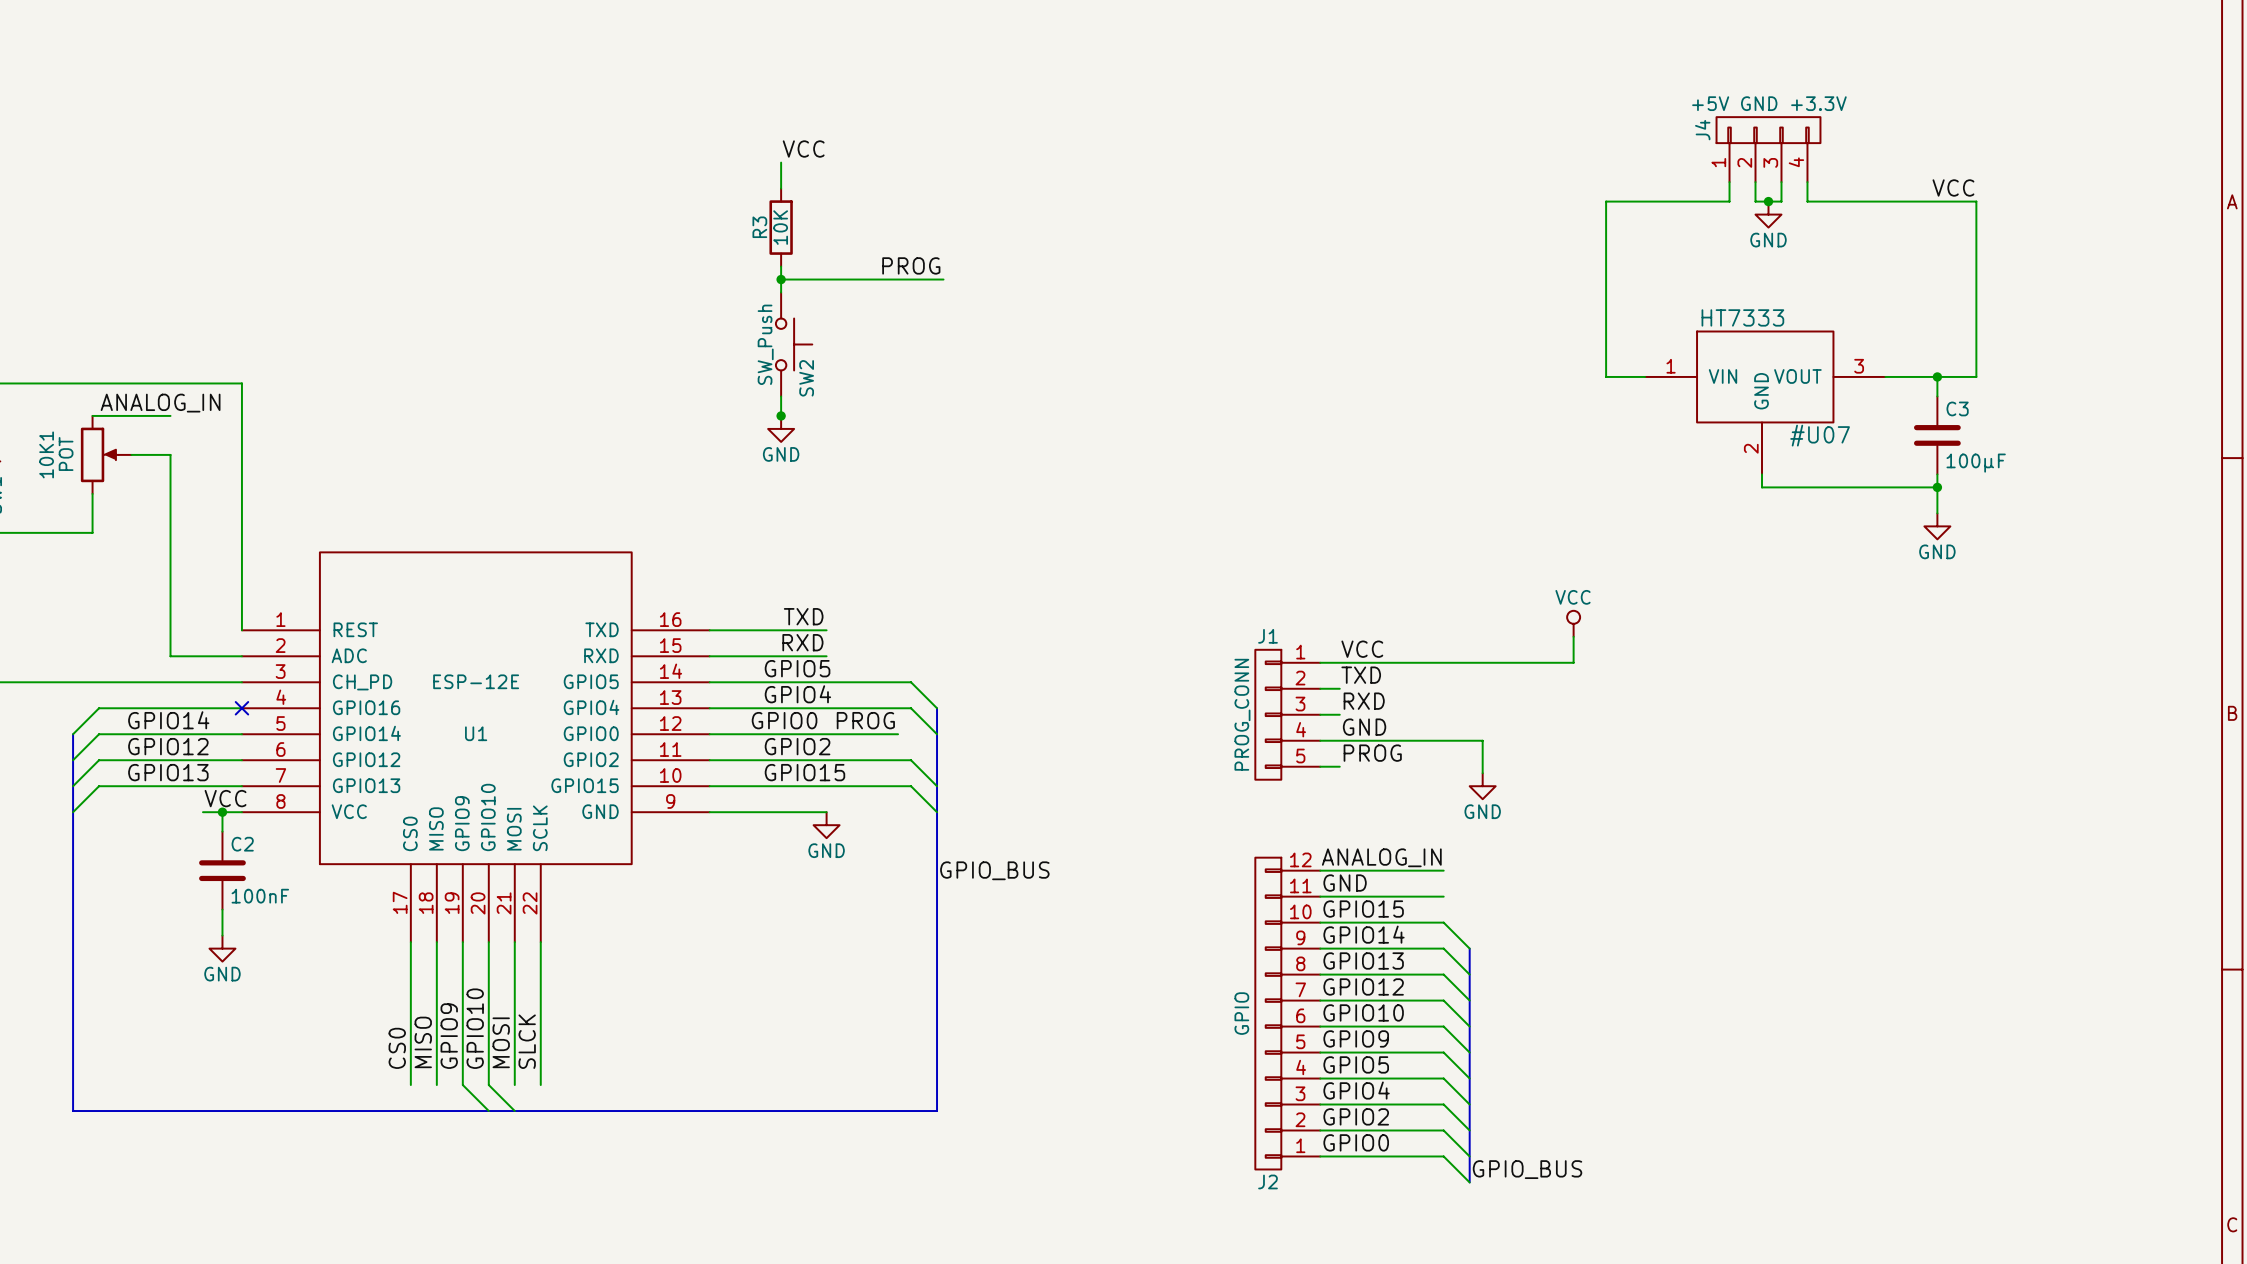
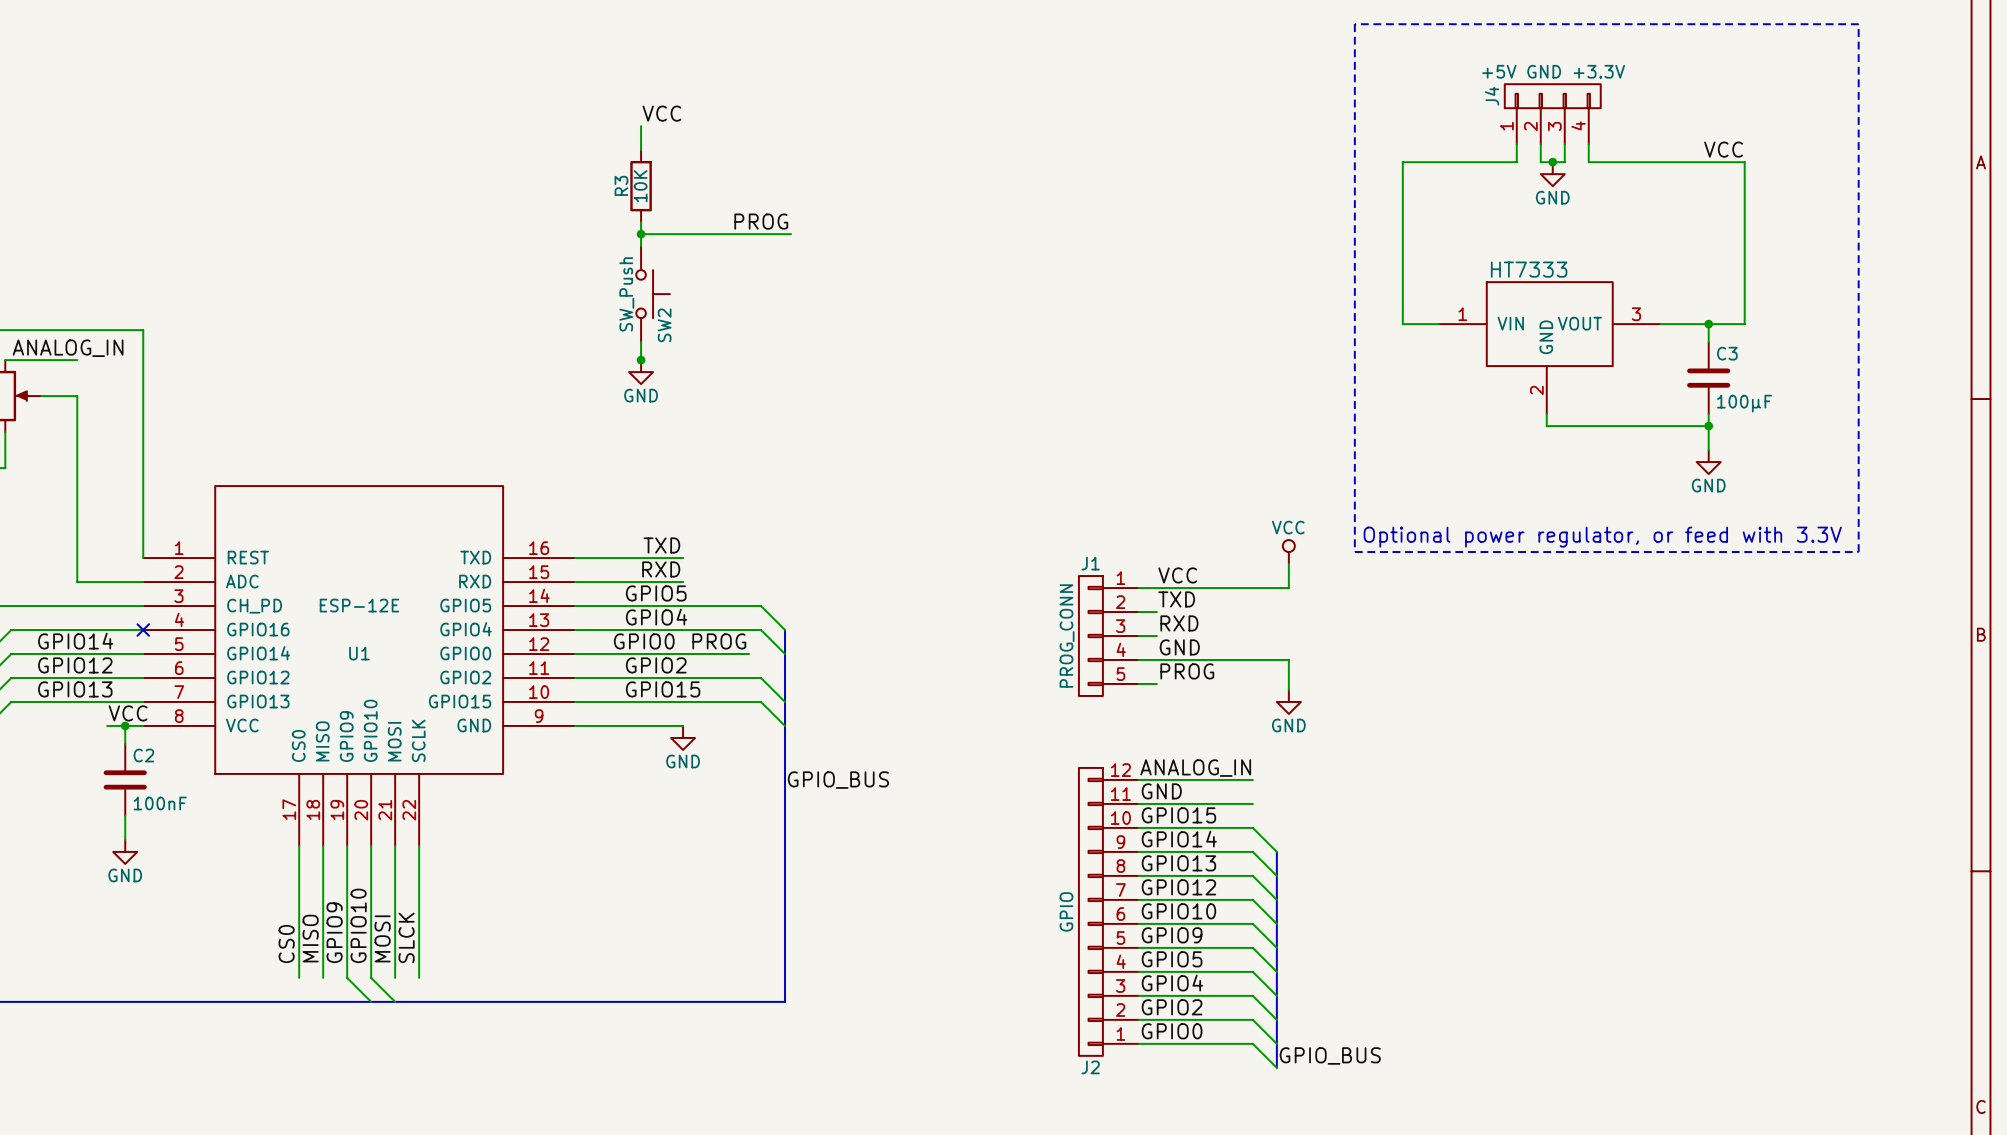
line: none -> (1354, 24) (1354, 552) (1858, 552) (1858, 24) (1354, 24)
#U07 name: #U07 (1820, 435) -> none
text: none -> Optional power regulator, or feed with 3.3V (1602, 537)
power symbol position: VCC (1573, 623) -> VCC (1288, 552)
wire: (1573, 636) (1573, 662) (1482, 662) -> (1288, 564) (1288, 588)

